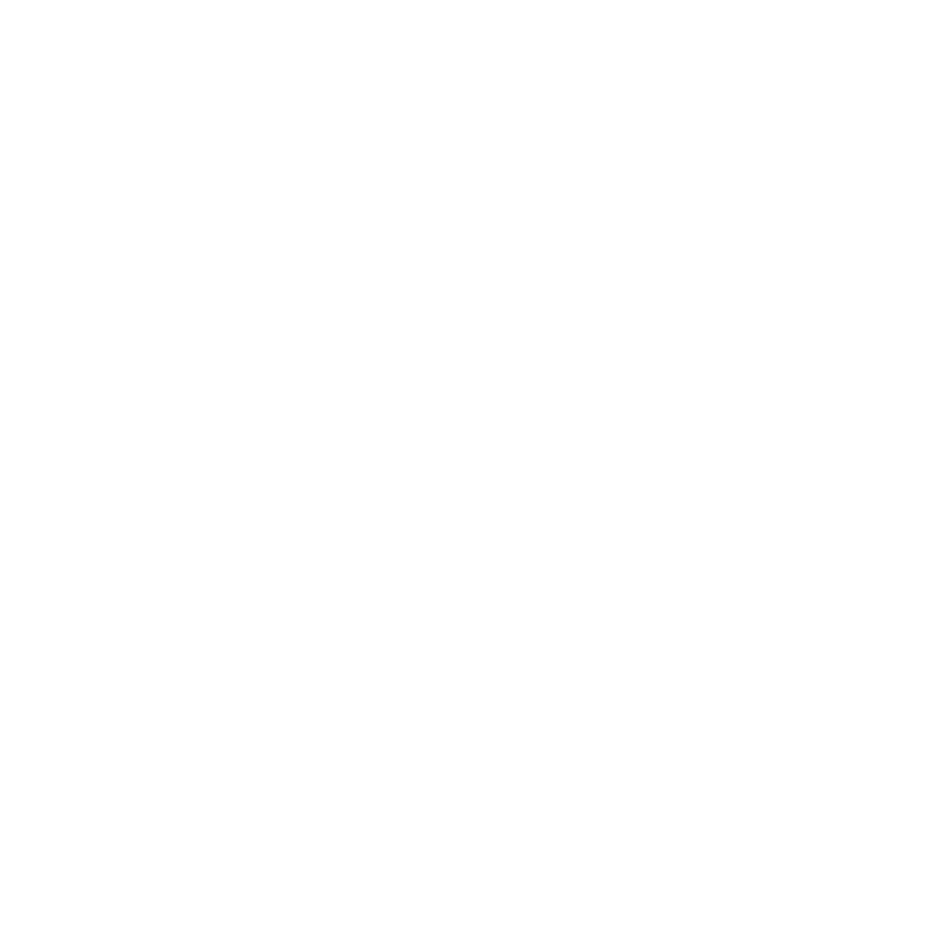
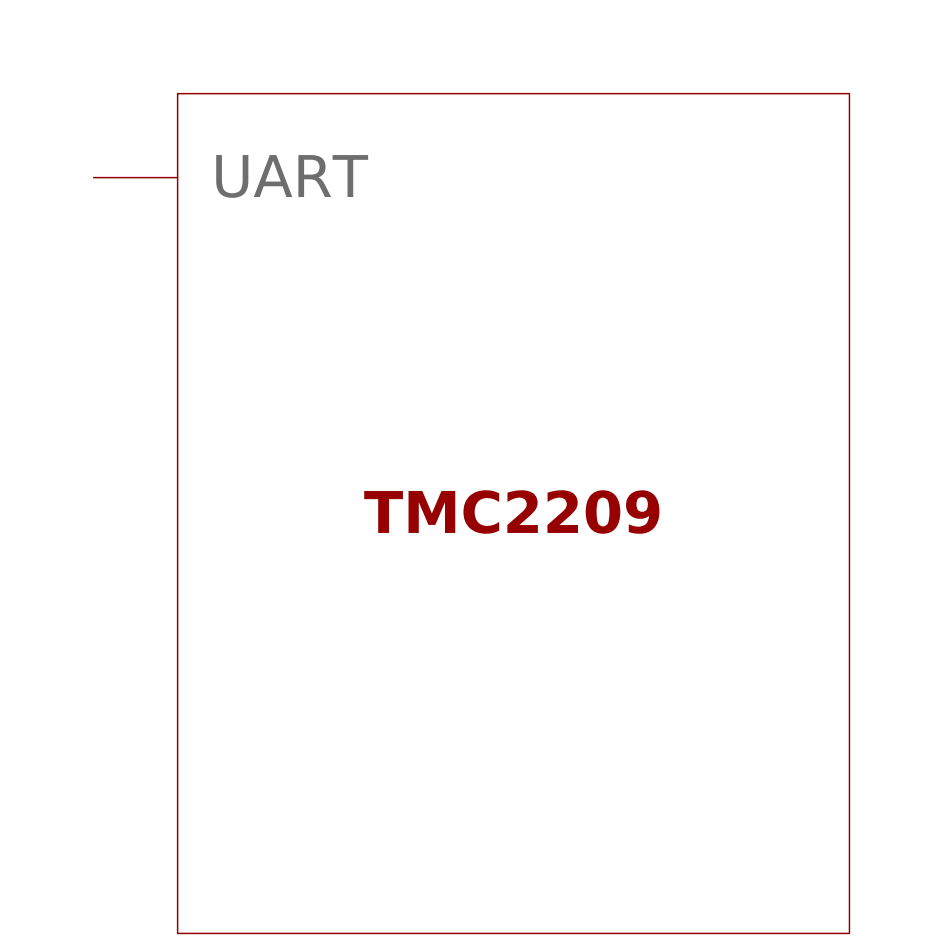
part: none -> (471, 513)

